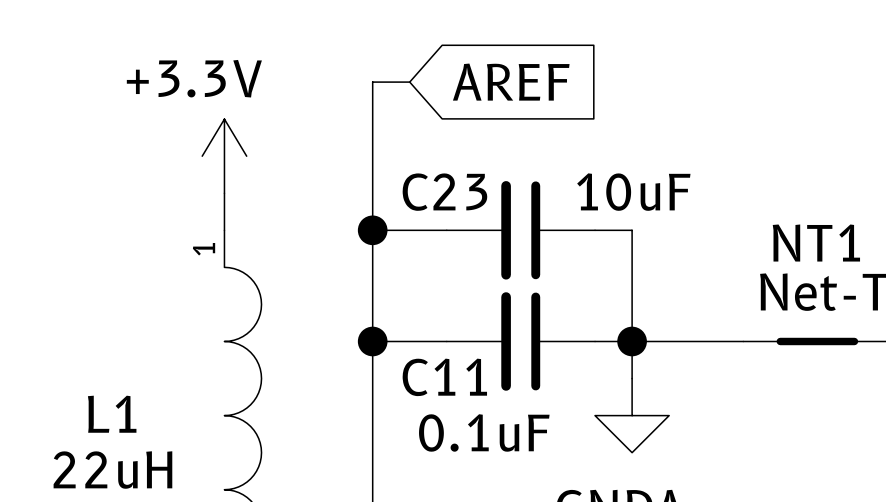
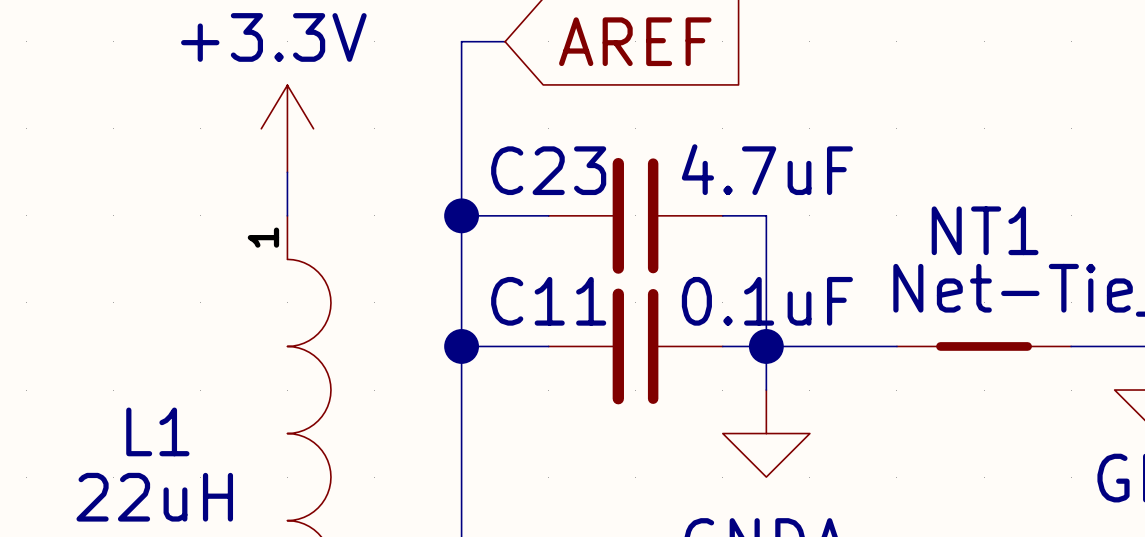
C23 value: 10uF (633, 192) -> 4.7uF (767, 169)
C11 name position: C11 (444, 377) -> C11 (548, 301)
C11 value position: 0.1uF (484, 432) -> 0.1uF (767, 301)

